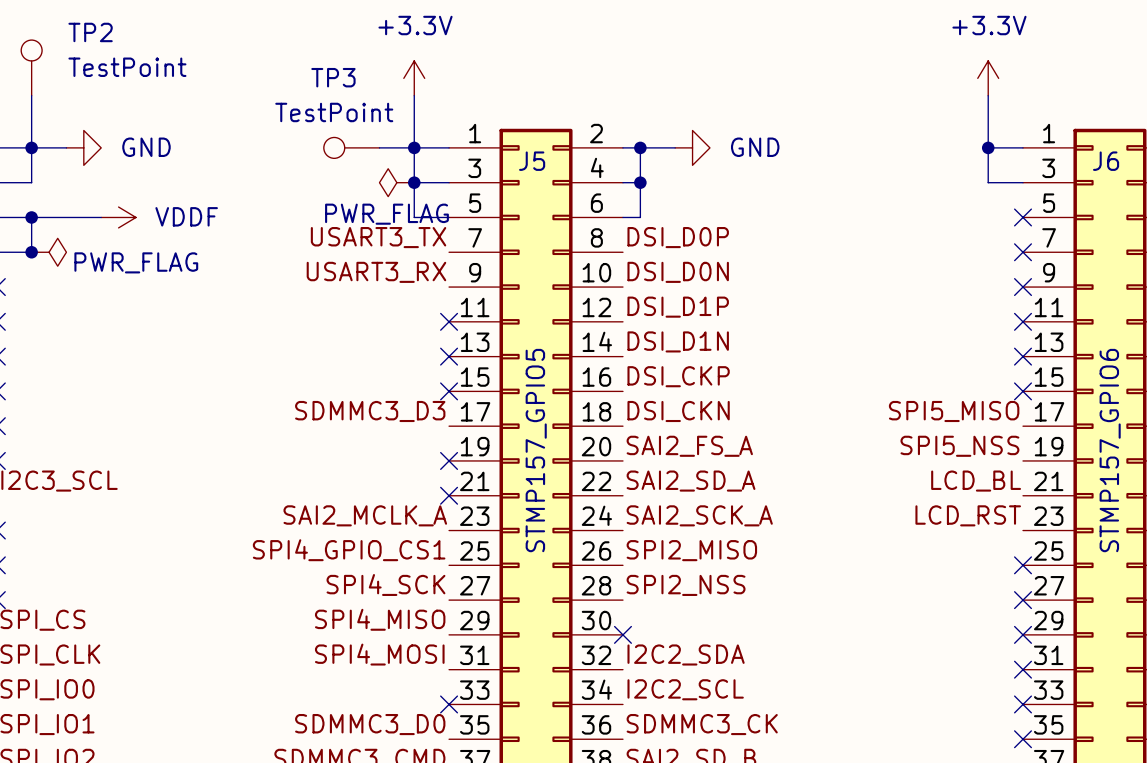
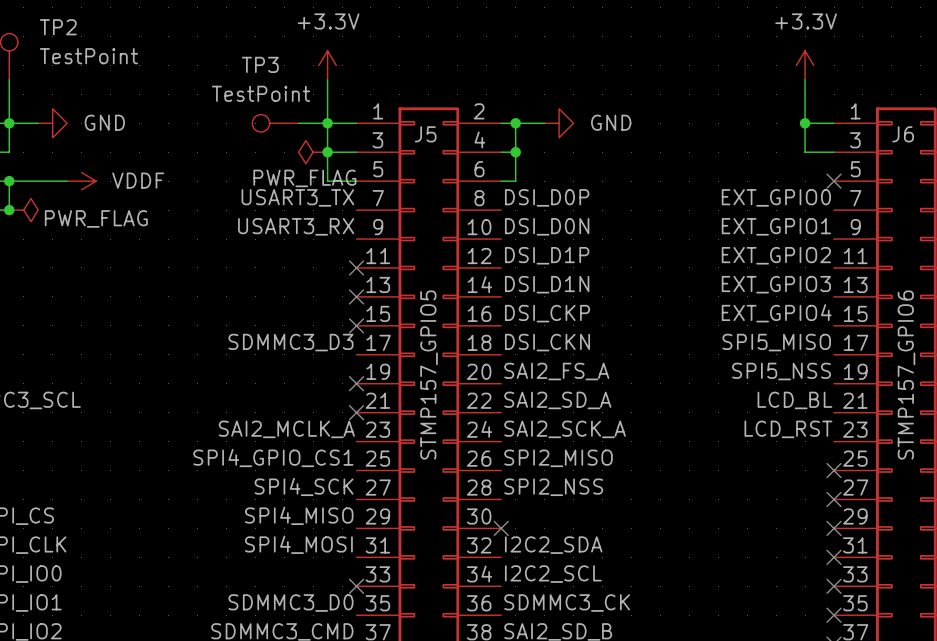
label: none -> EXT_GPIO0 (776, 197)
no-connect mark: (1023, 252) -> none
label: none -> EXT_GPIO1 (776, 226)
no-connect mark: (1023, 287) -> none
label: none -> EXT_GPIO2 (776, 255)
no-connect mark: (1023, 321) -> none
label: none -> EXT_GPIO3 (776, 284)
no-connect mark: (1023, 356) -> none
label: none -> EXT_GPIO4 (776, 313)
no-connect mark: (1023, 391) -> none

